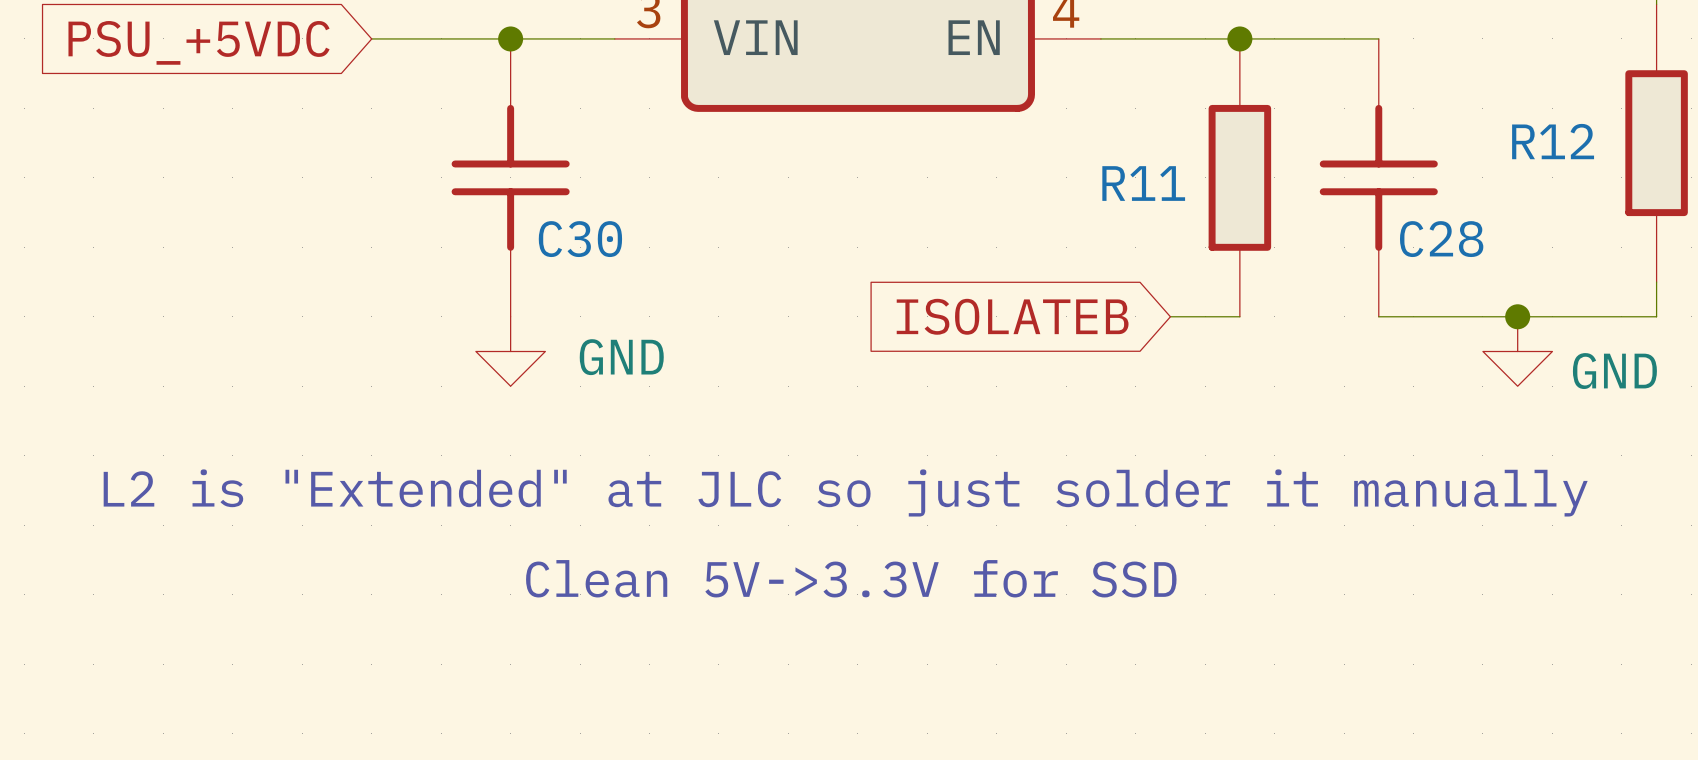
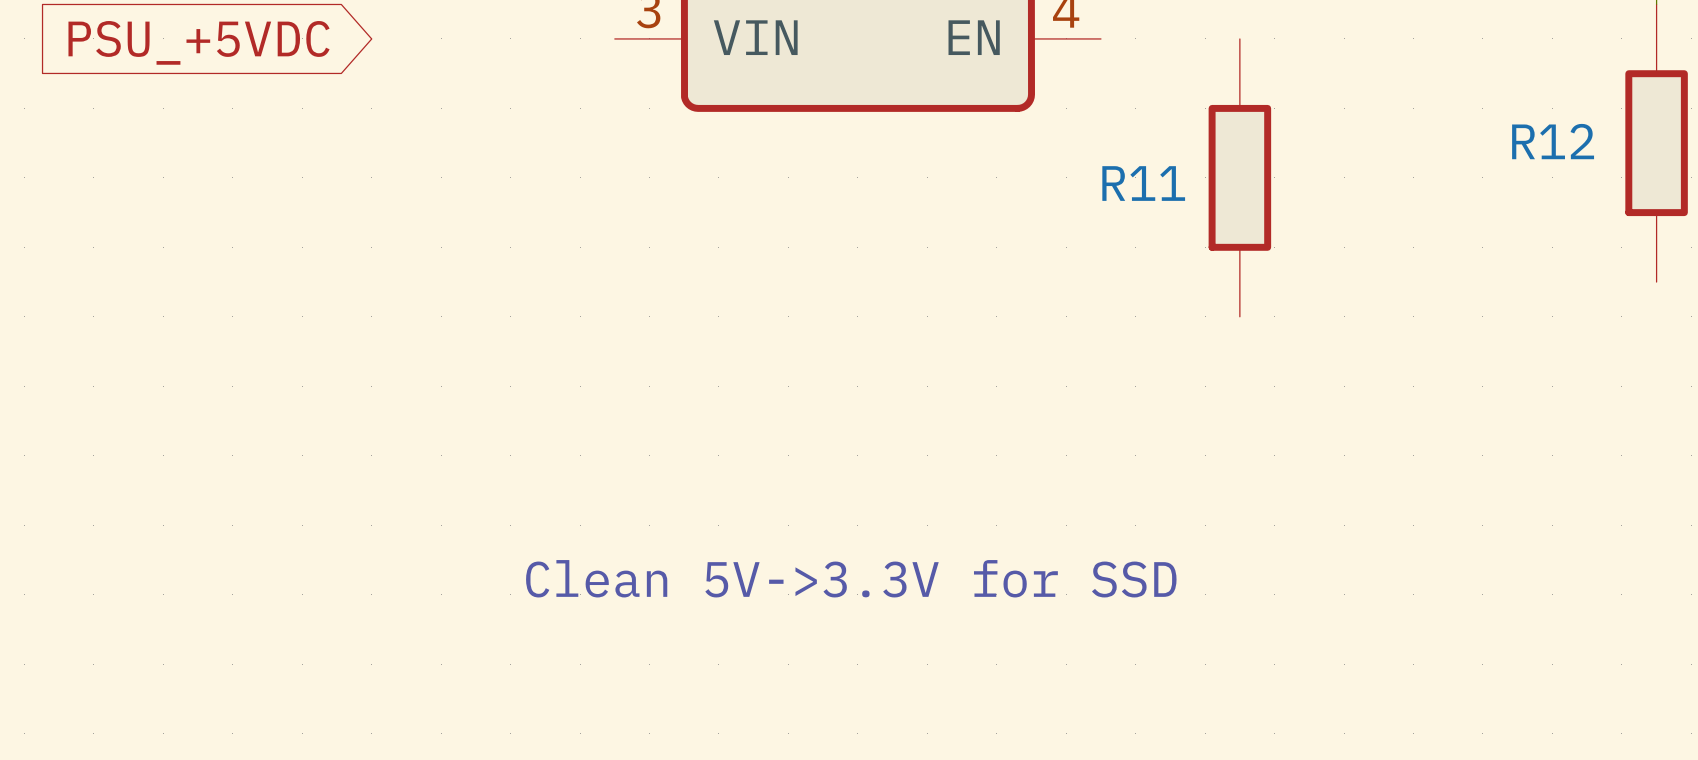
wire: (371, 38) (614, 38) -> none
junction: (510, 38) -> none
wire: (1100, 38) (1378, 38) -> none
junction: (1239, 38) -> none
C30: (510, 177) -> none
C28: (1378, 177) -> none
wire: (1656, 282) (1656, 316) (1378, 316) -> none
global label: ISOLATEB (1012, 316) -> none
wire: (1170, 316) (1239, 316) -> none
junction: (1517, 316) -> none
power symbol: GND (510, 351) -> none
power symbol: GND (1517, 351) -> none
text: L2 is "Extended" at JLC so just solder it manually (845, 492) -> none

